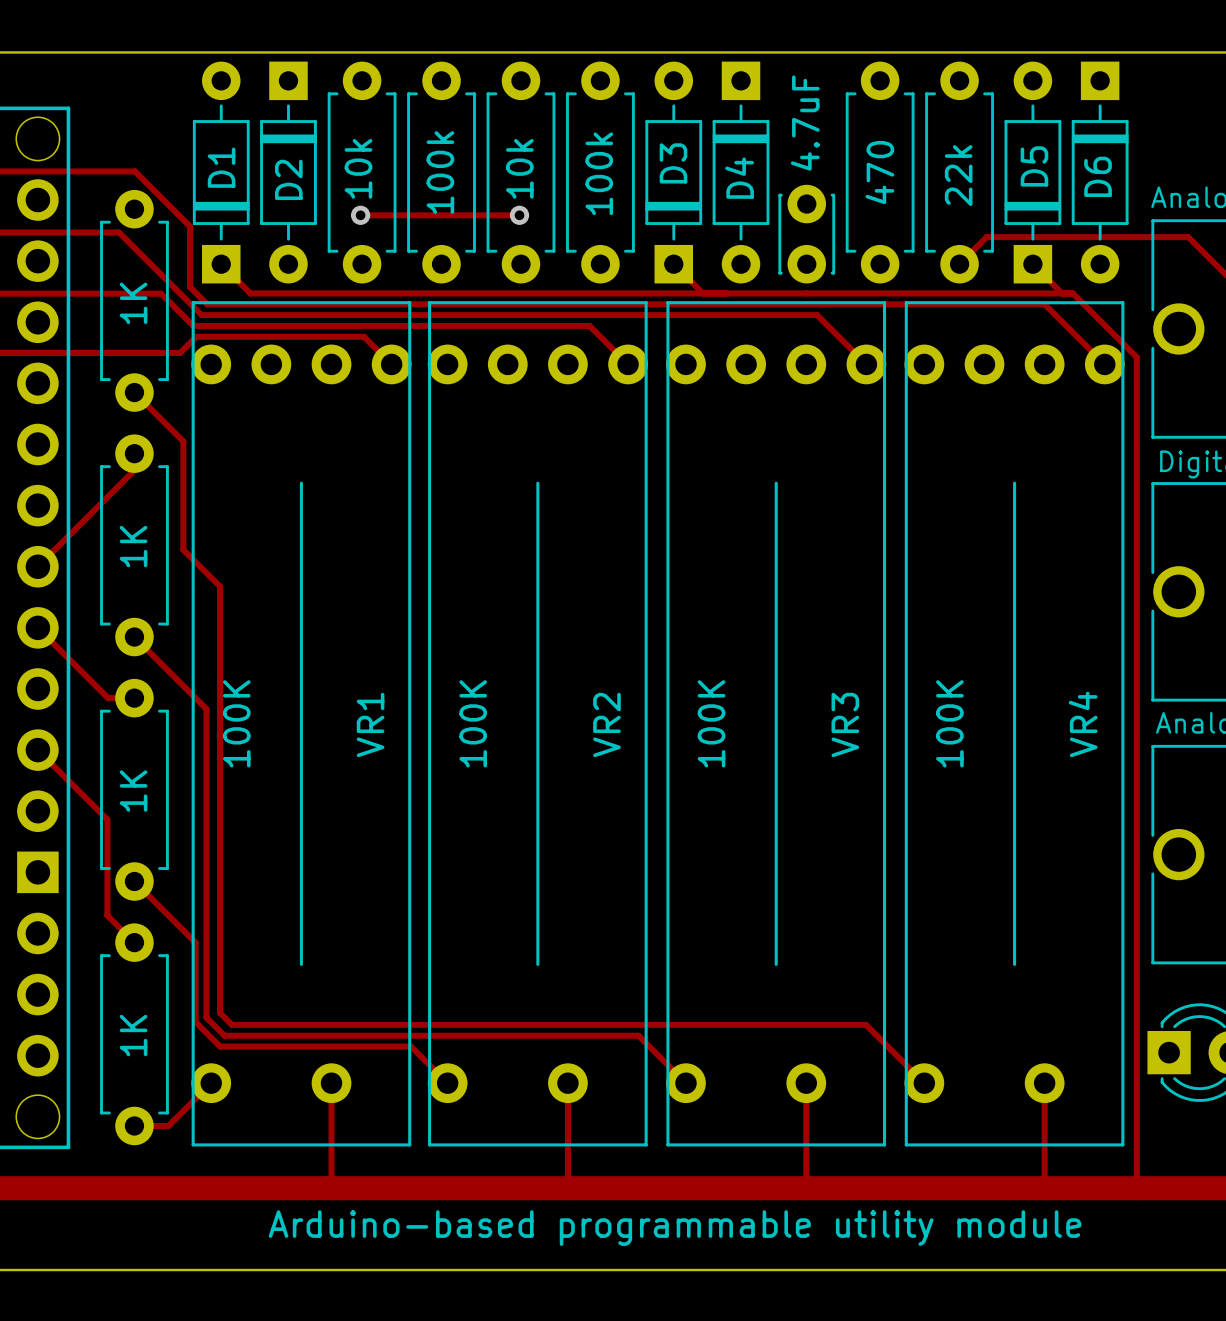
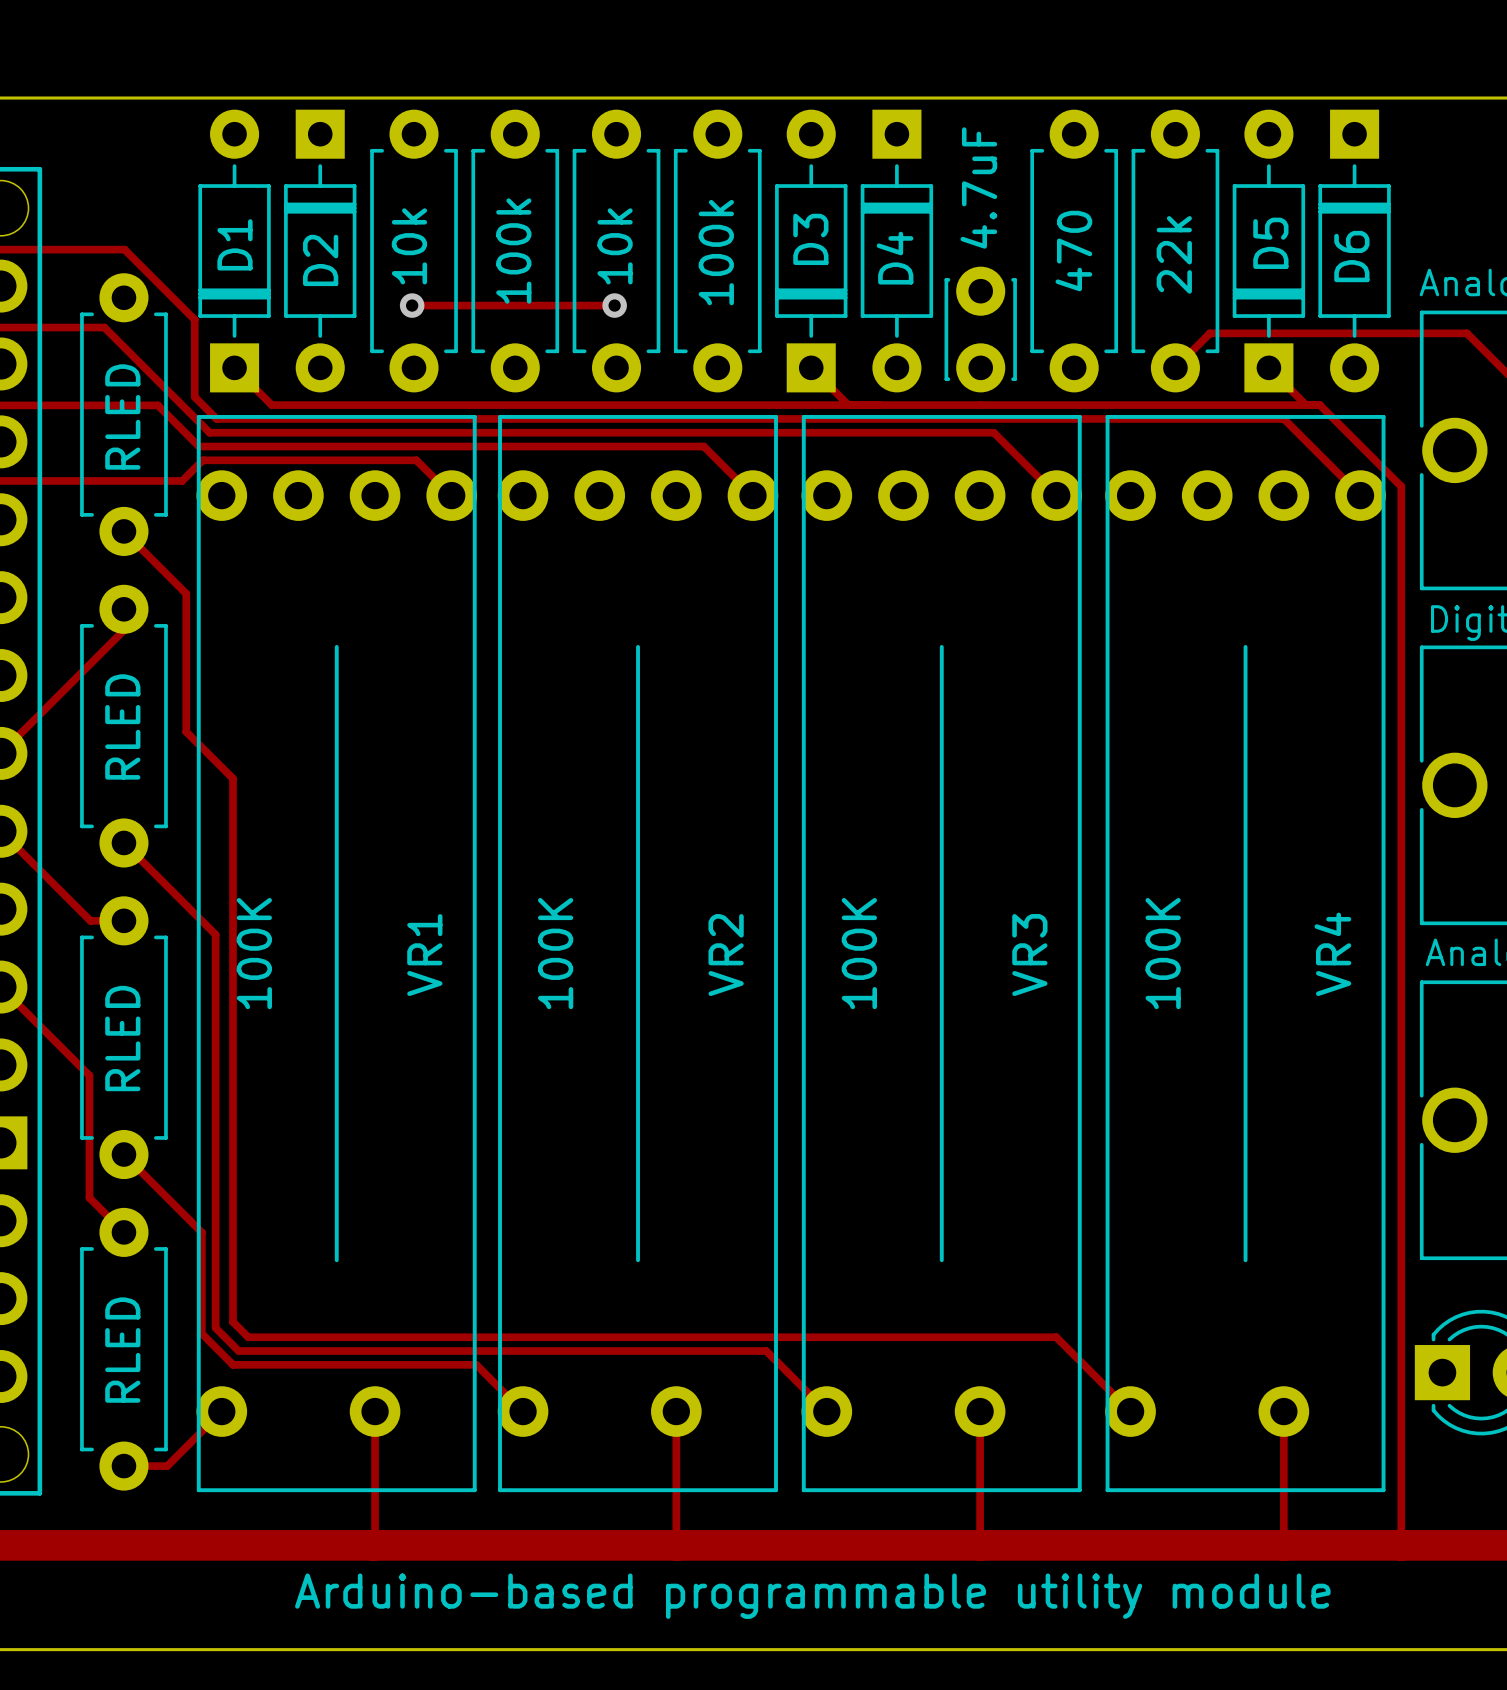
part value: 1K (133, 303) -> RLED (122, 416)
part value: 1K (133, 546) -> RLED (122, 726)
part value: 1K (133, 791) -> RLED (122, 1038)
part value: 1K (133, 1035) -> RLED (122, 1350)

